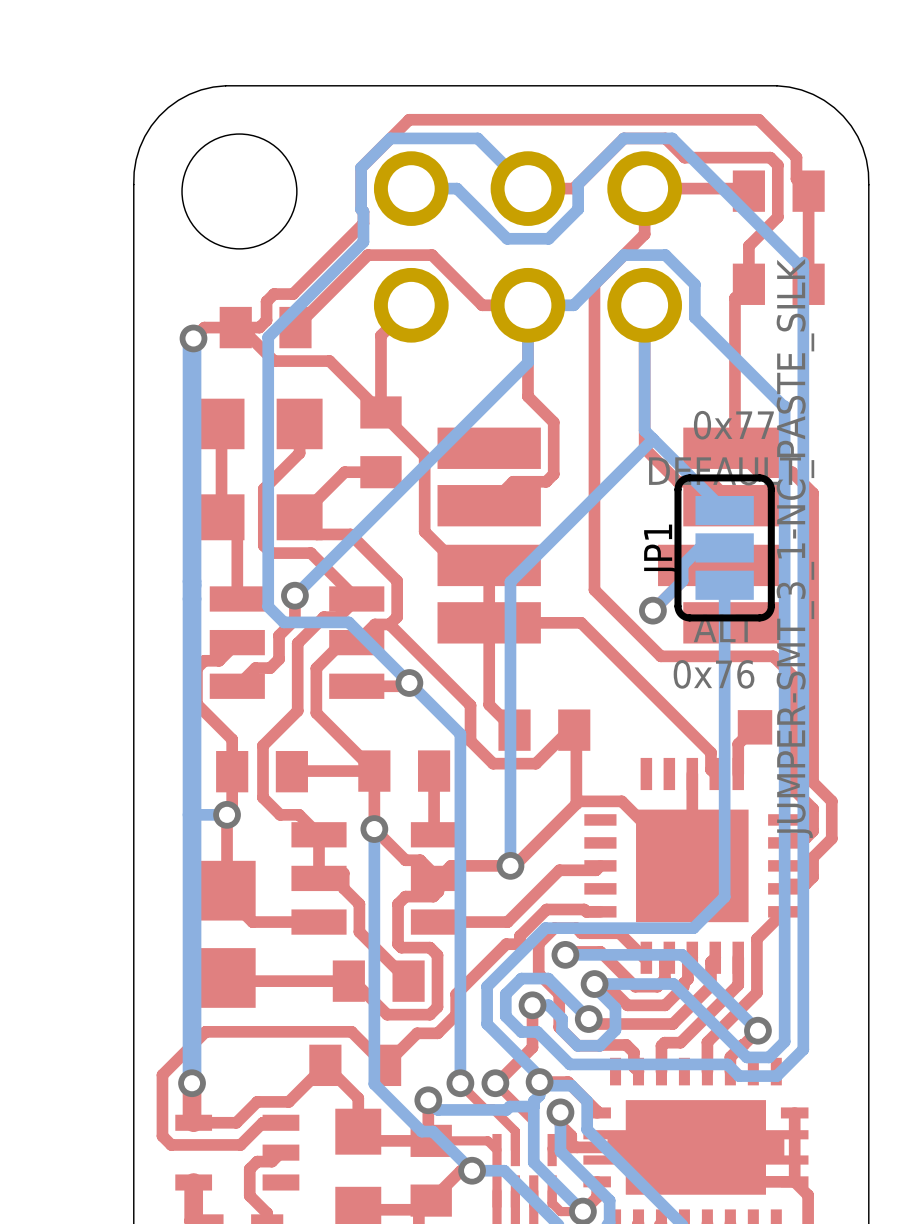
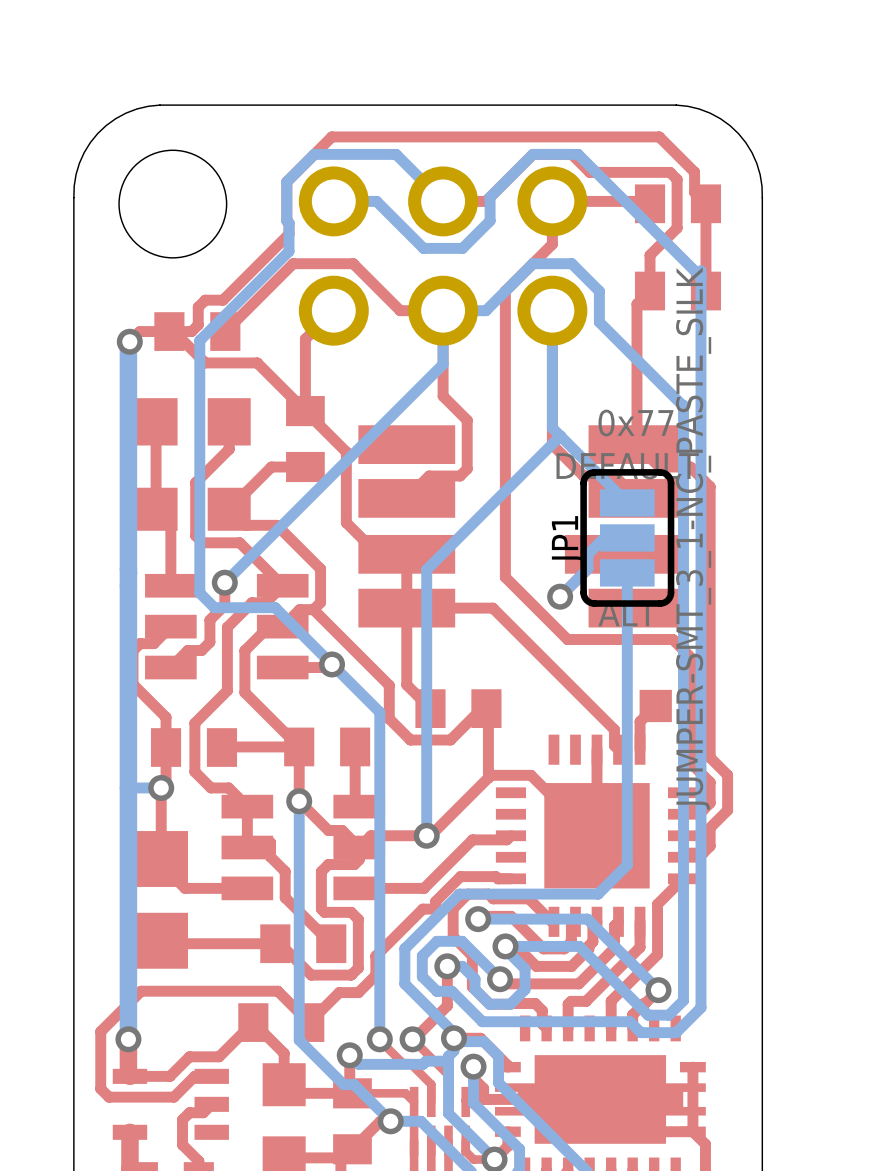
text: 0x76 (714, 674) -> none

